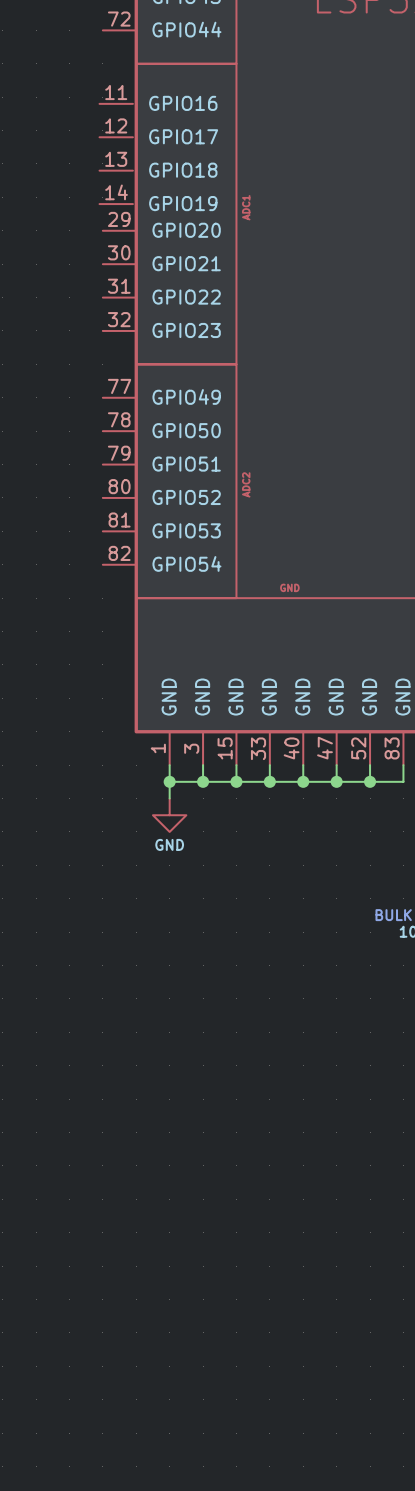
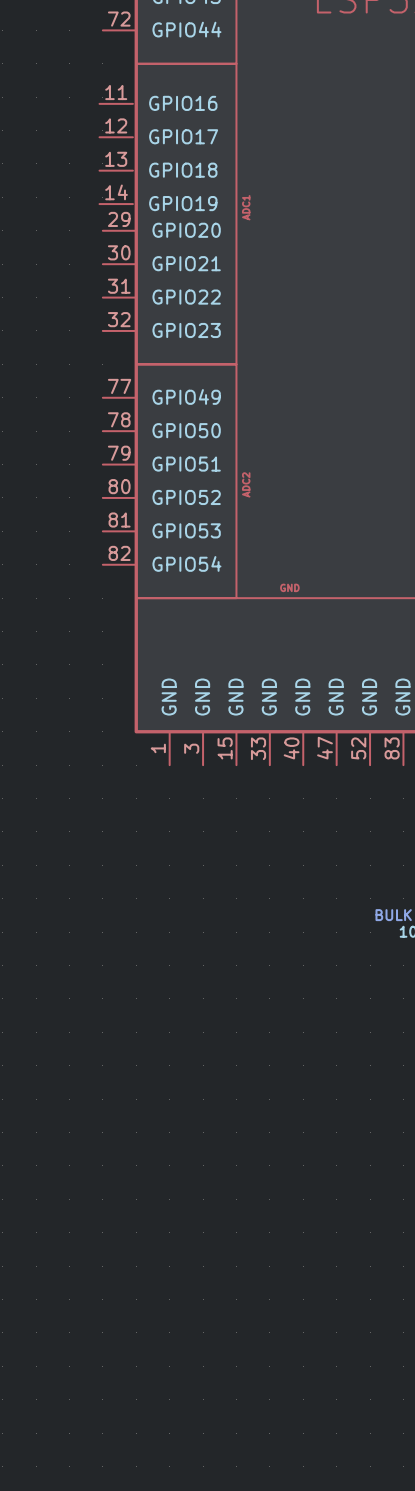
wire: (169, 765) (169, 798) -> none
wire: (203, 765) (203, 781) -> none
wire: (236, 765) (236, 781) -> none
wire: (269, 765) (269, 781) -> none
wire: (303, 765) (303, 781) -> none
wire: (336, 765) (336, 781) -> none
wire: (370, 765) (370, 781) -> none
wire: (403, 765) (403, 781) (169, 781) -> none
junction: (169, 781) -> none
junction: (203, 781) -> none
junction: (236, 781) -> none
junction: (269, 781) -> none
junction: (303, 781) -> none
junction: (336, 781) -> none
junction: (370, 781) -> none
power symbol: GND (169, 815) -> none

